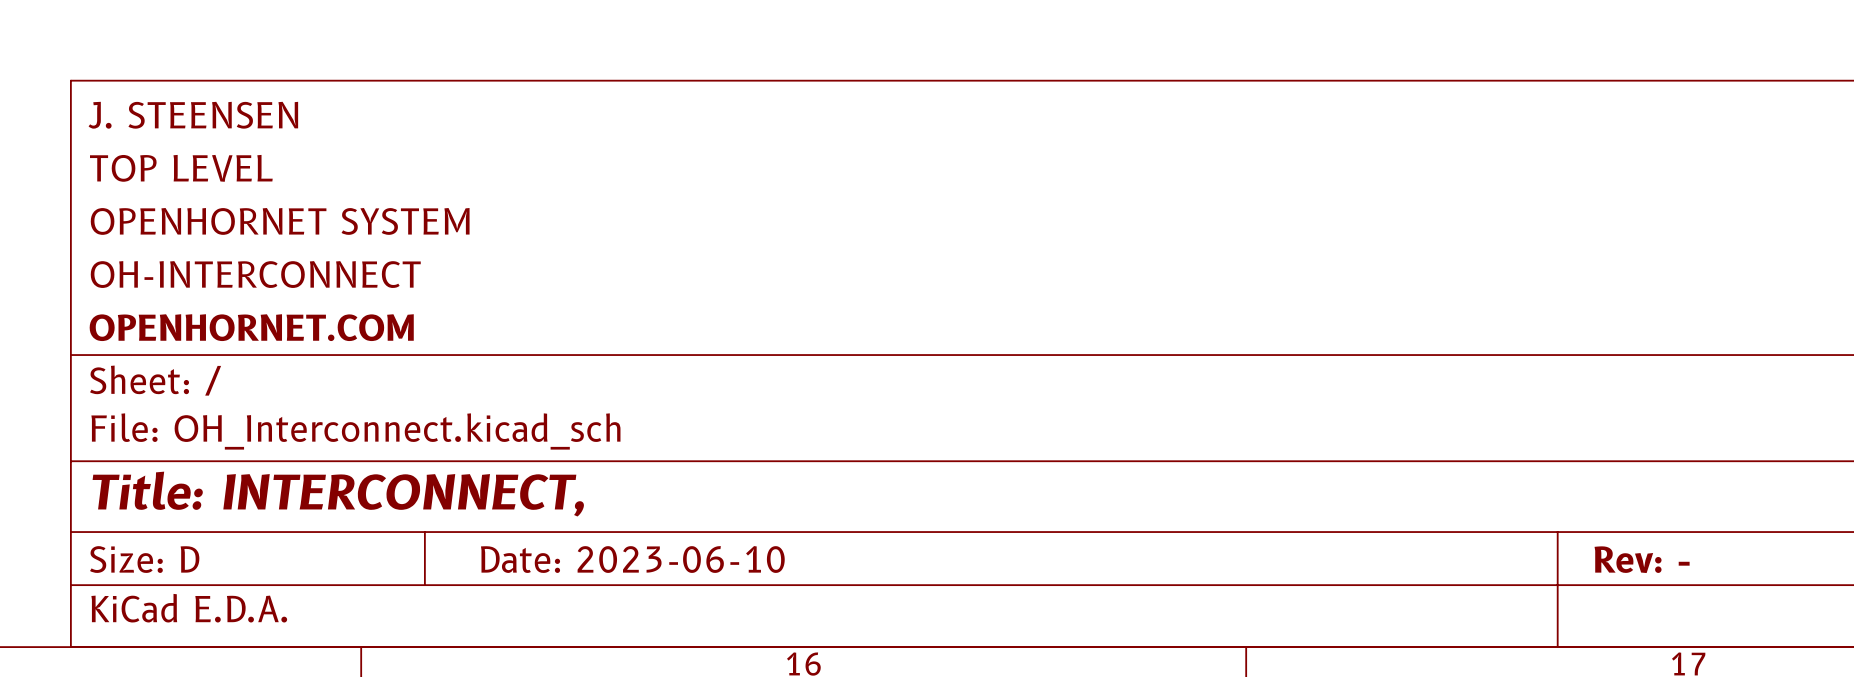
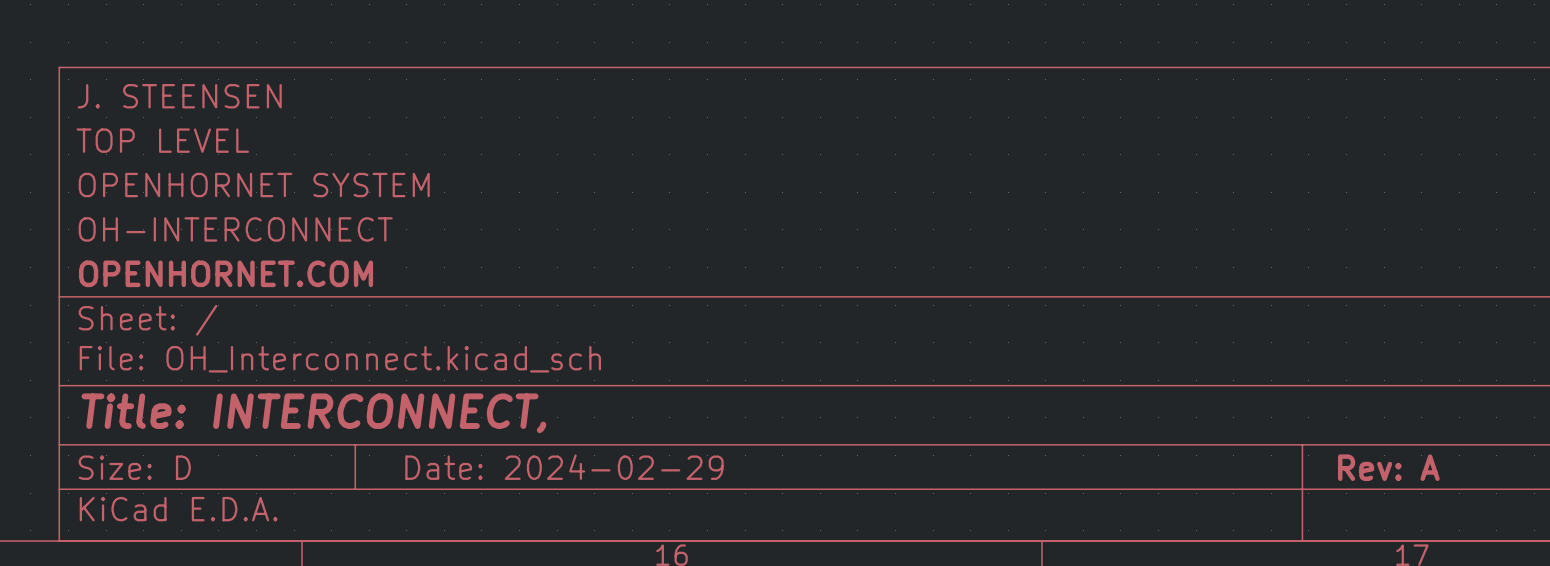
title block: Date: 2023-06-10 (632, 559) -> Date: 2024-02-29 (564, 467)
title block: Rev: - (1642, 559) -> Rev: A (1388, 467)

